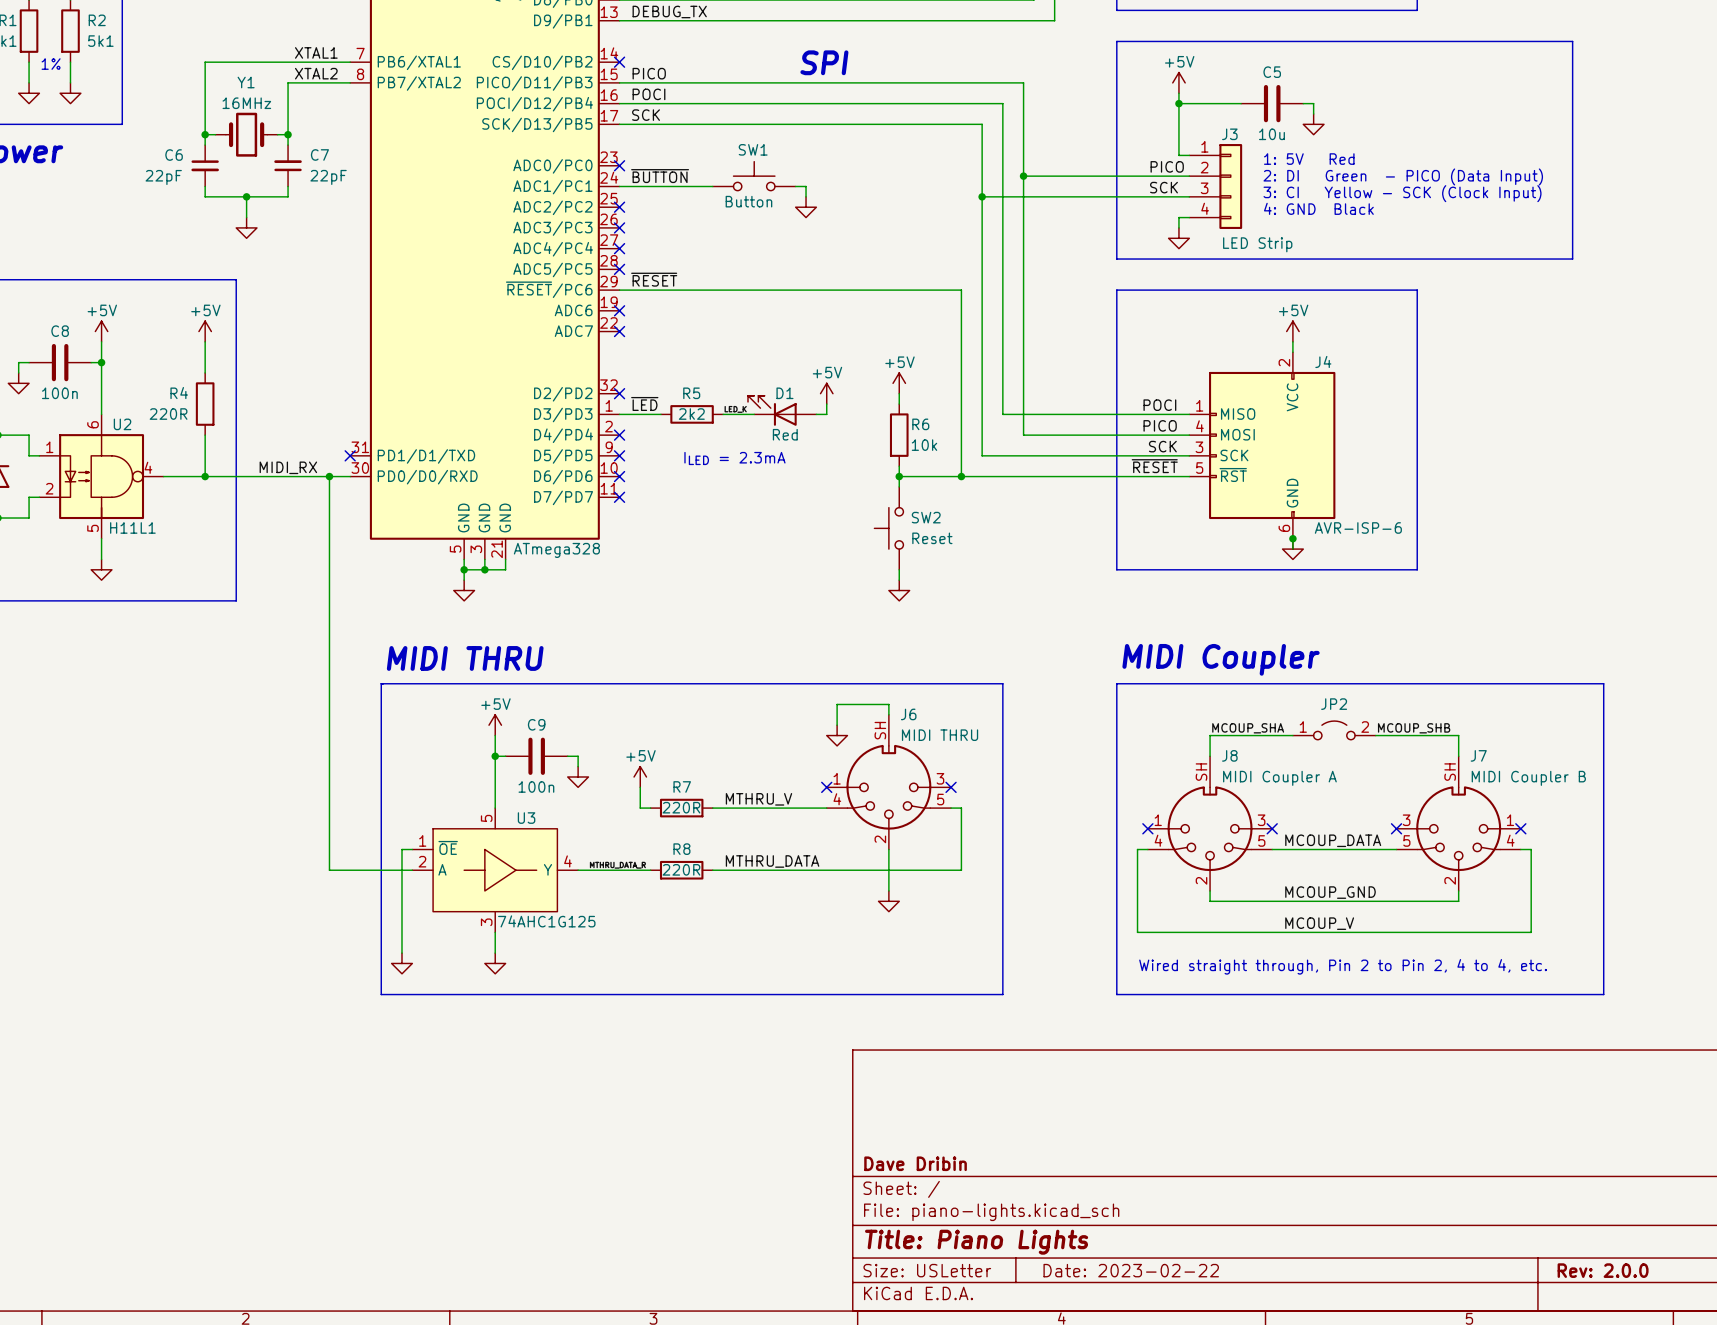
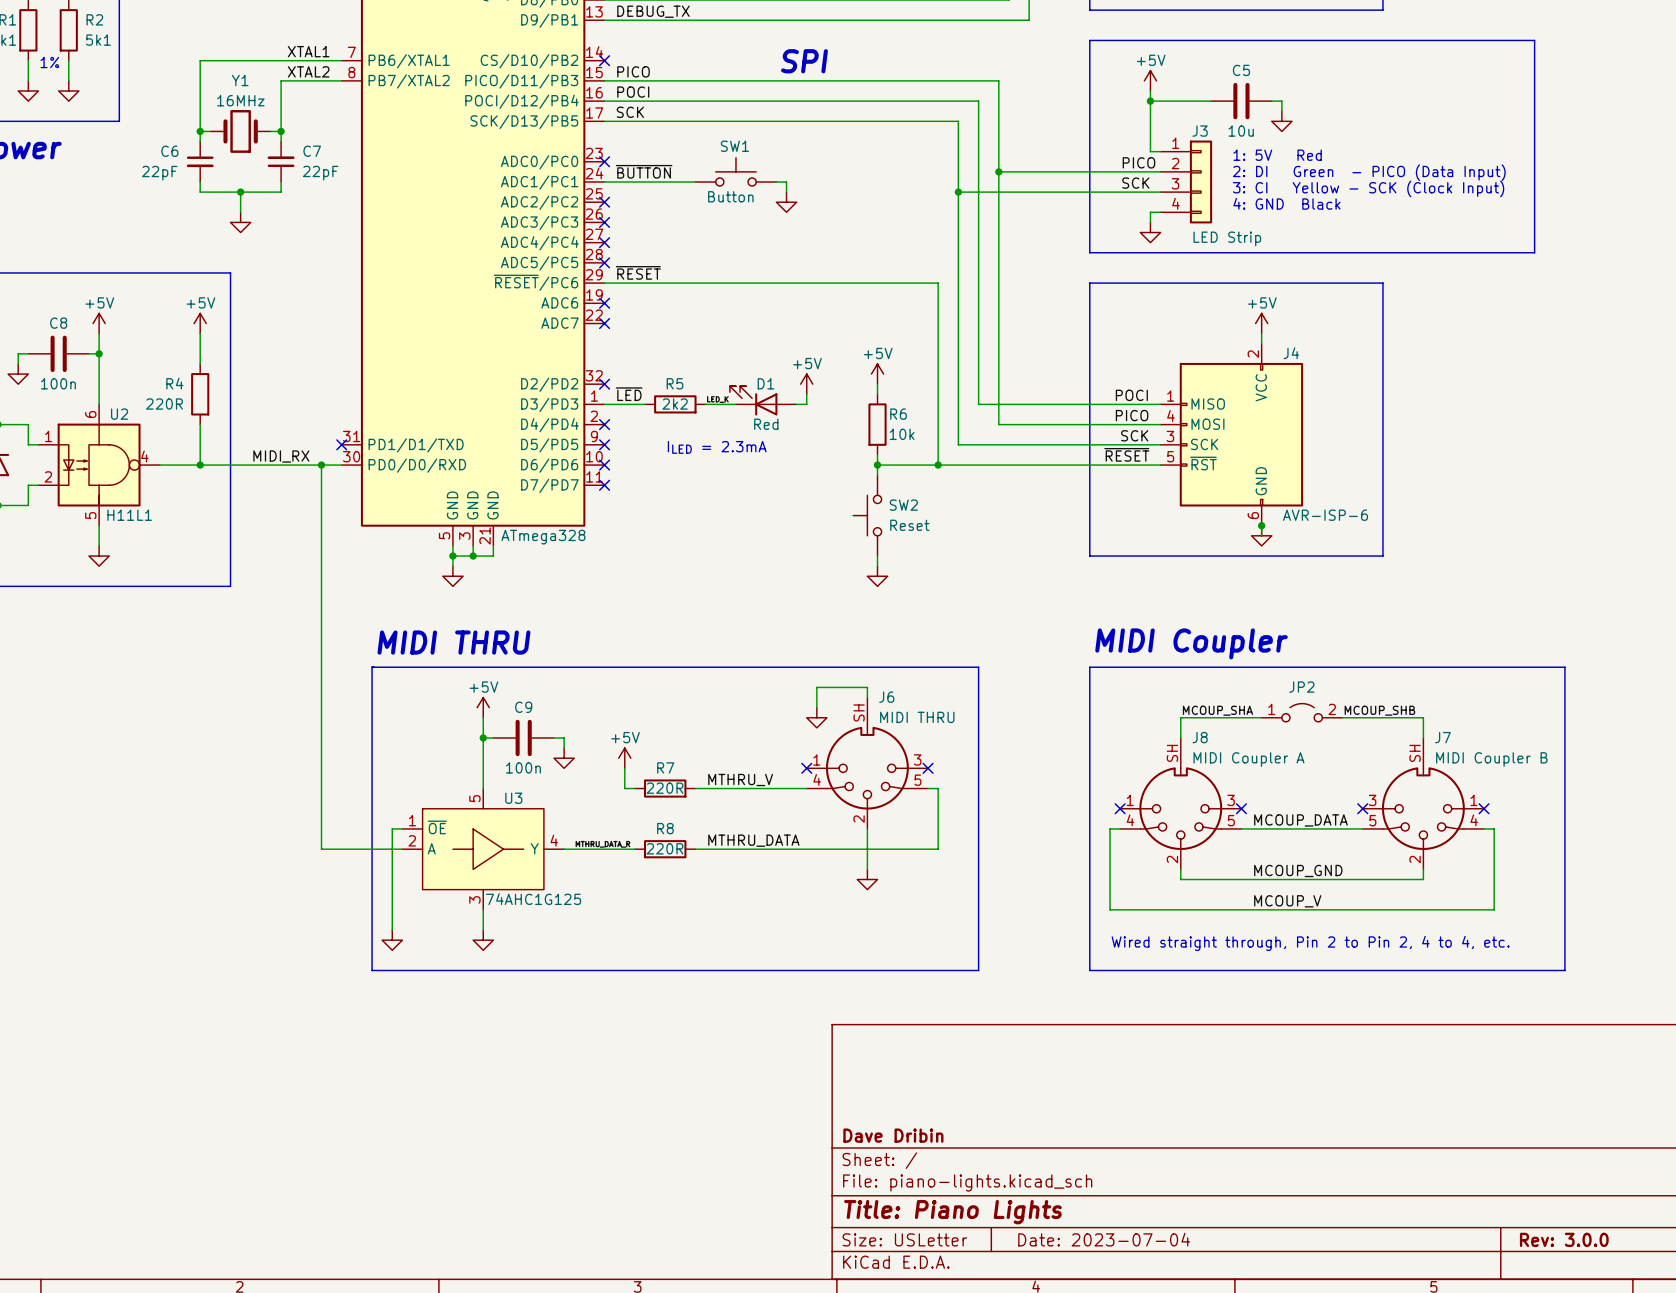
title block: Date: 2023-02-22 (1131, 1270) -> Date: 2023-07-04 (1104, 1239)
title block: Rev: 2.0.0 (1603, 1270) -> Rev: 3.0.0 (1564, 1239)

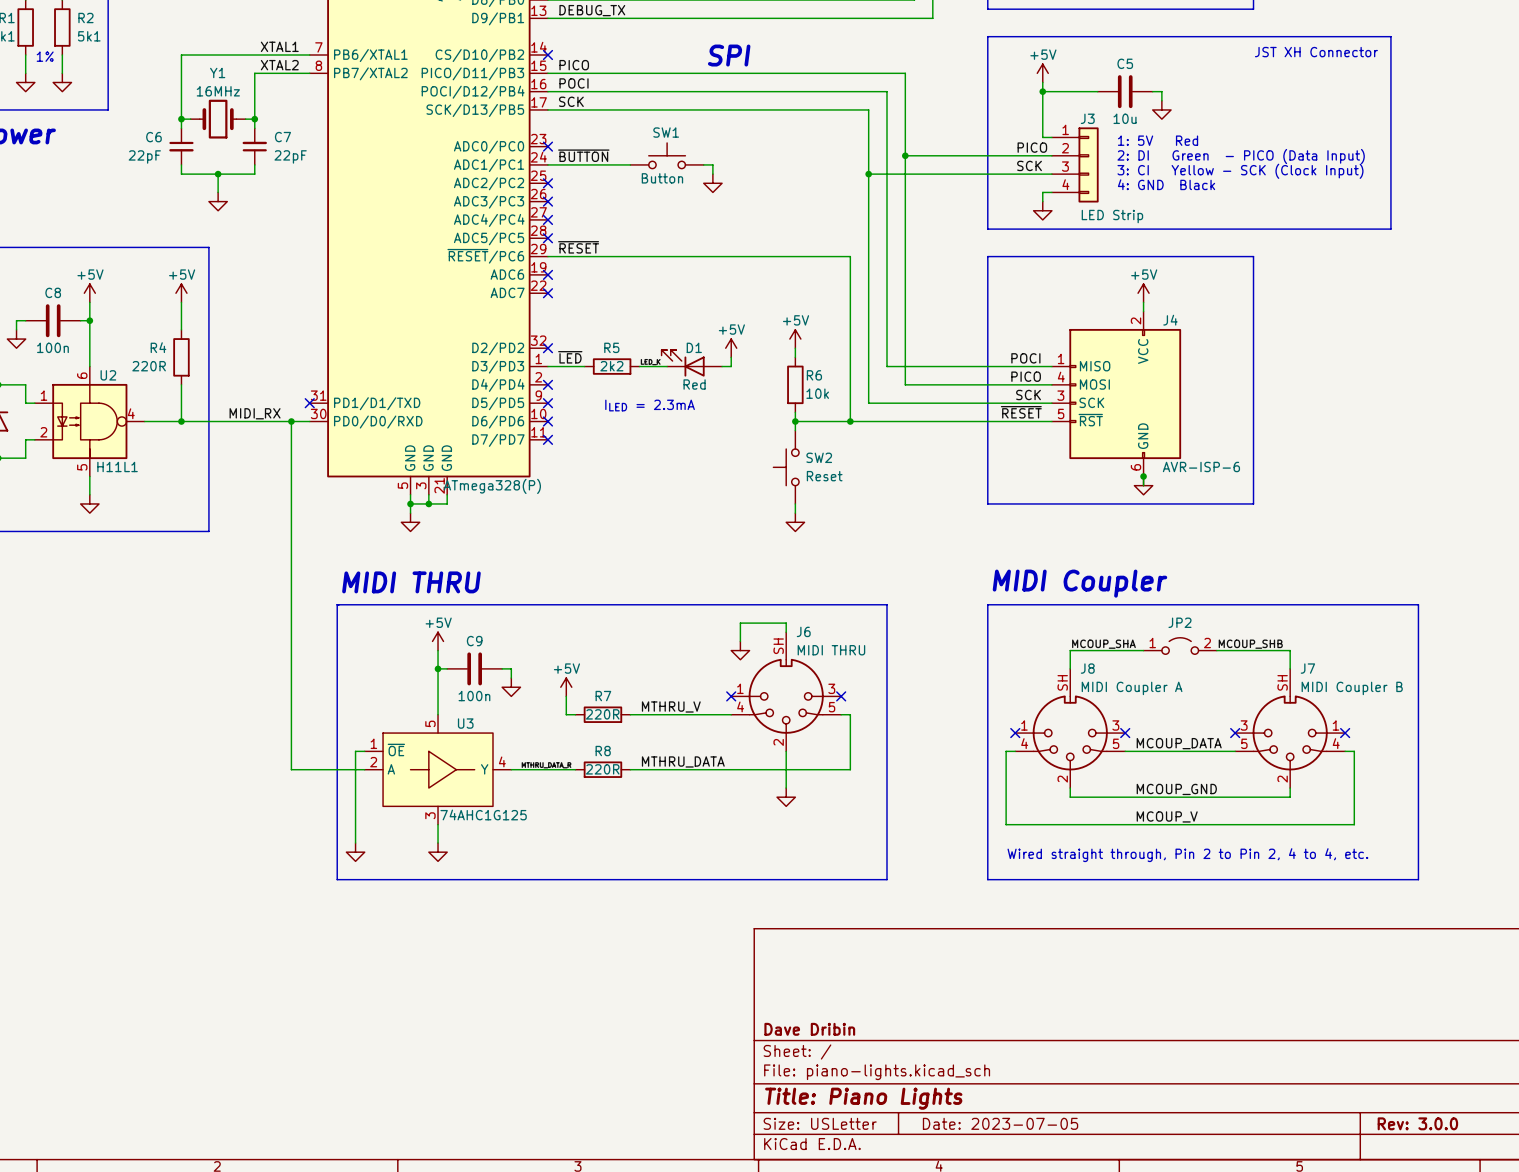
text: none -> JST XH Connector (1316, 52)
part value: ATmega328 (543, 537) -> ATmega328(P) (492, 486)
title block: Date: 2023-07-04 (1104, 1239) -> Date: 2023-07-05 (1000, 1123)

